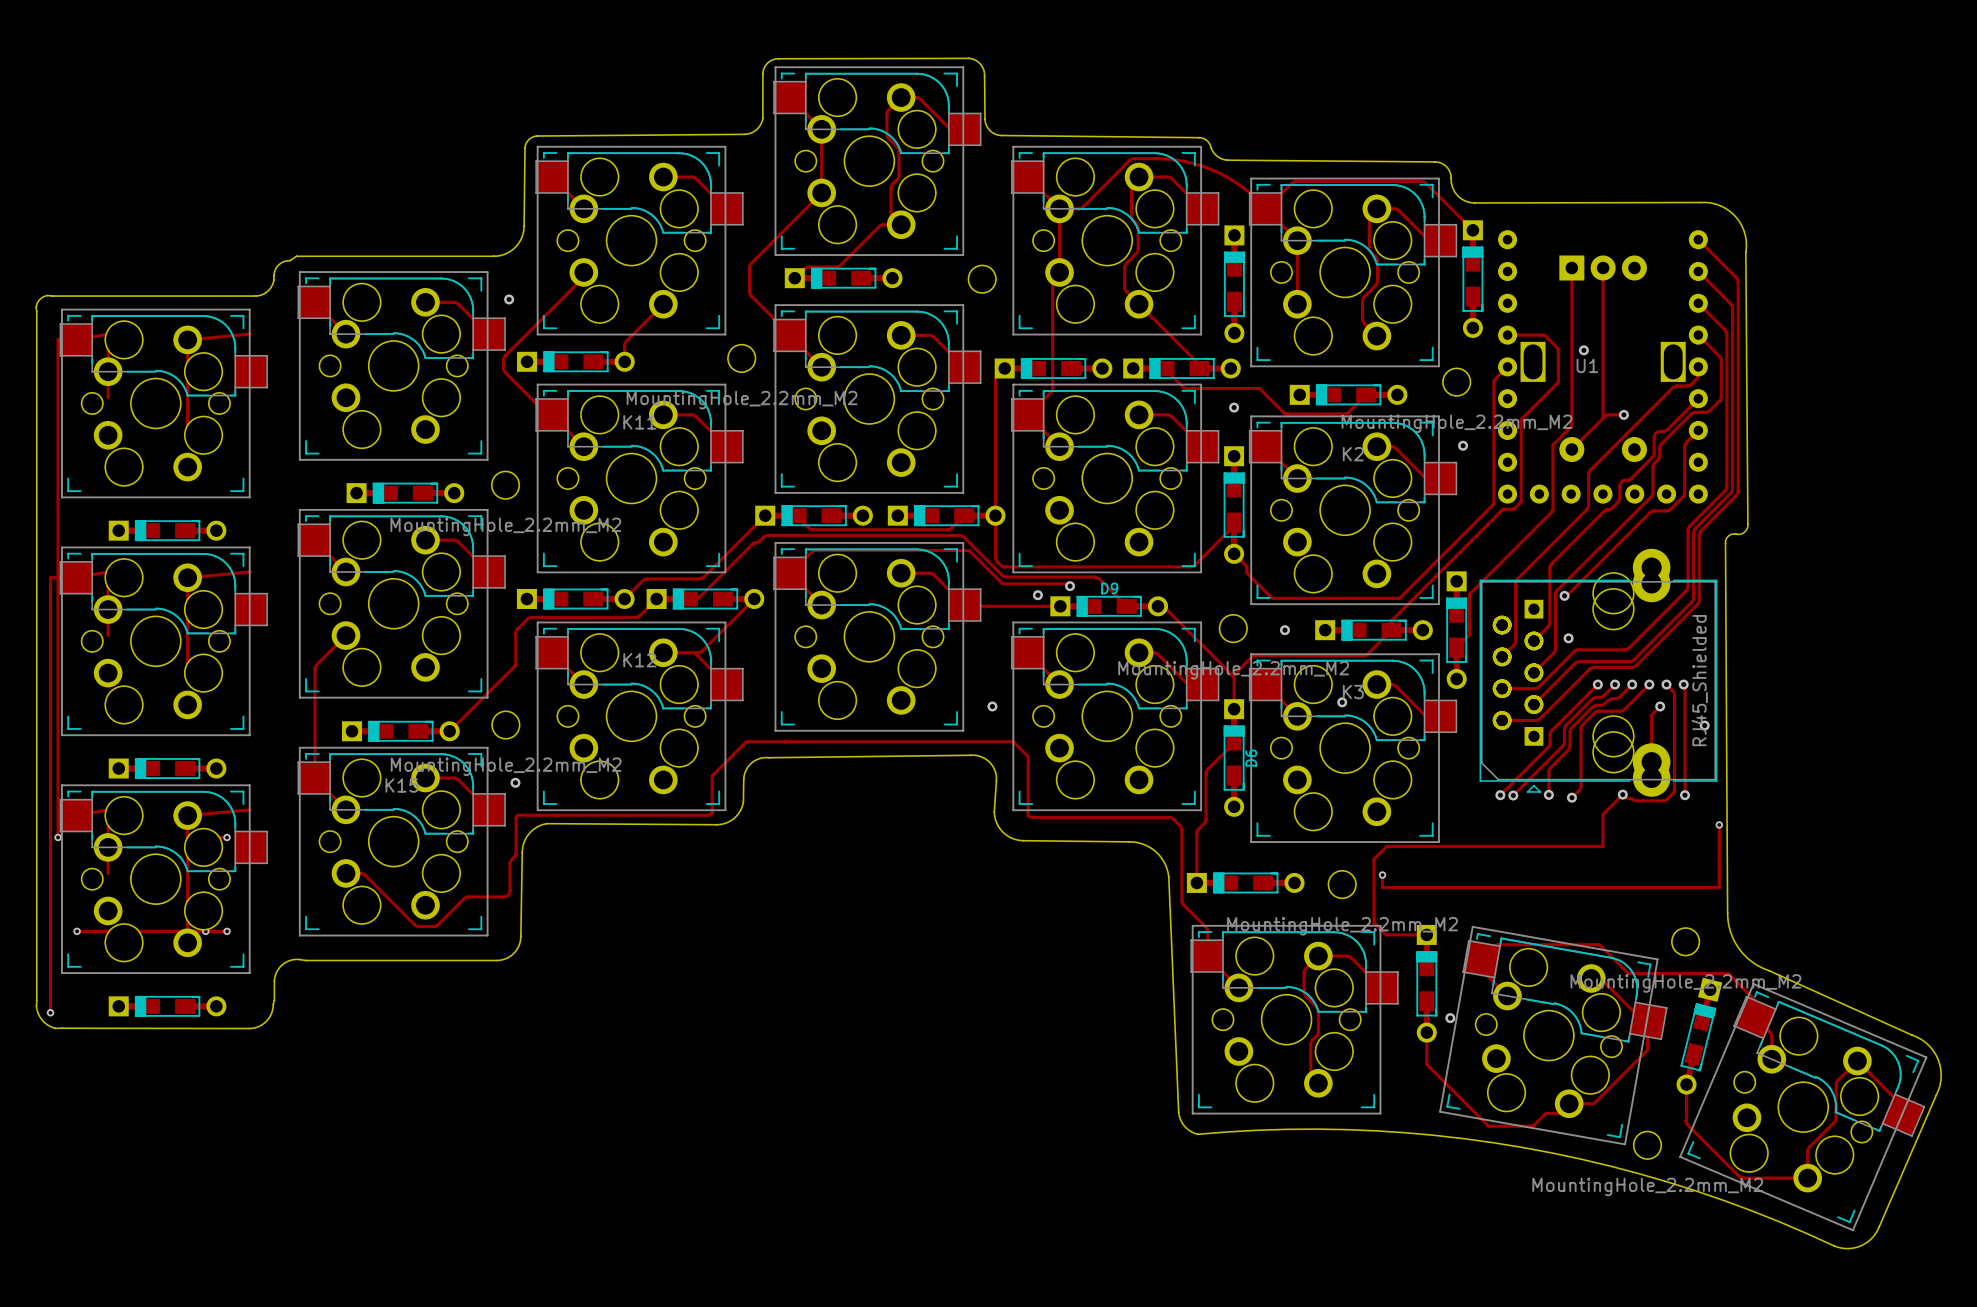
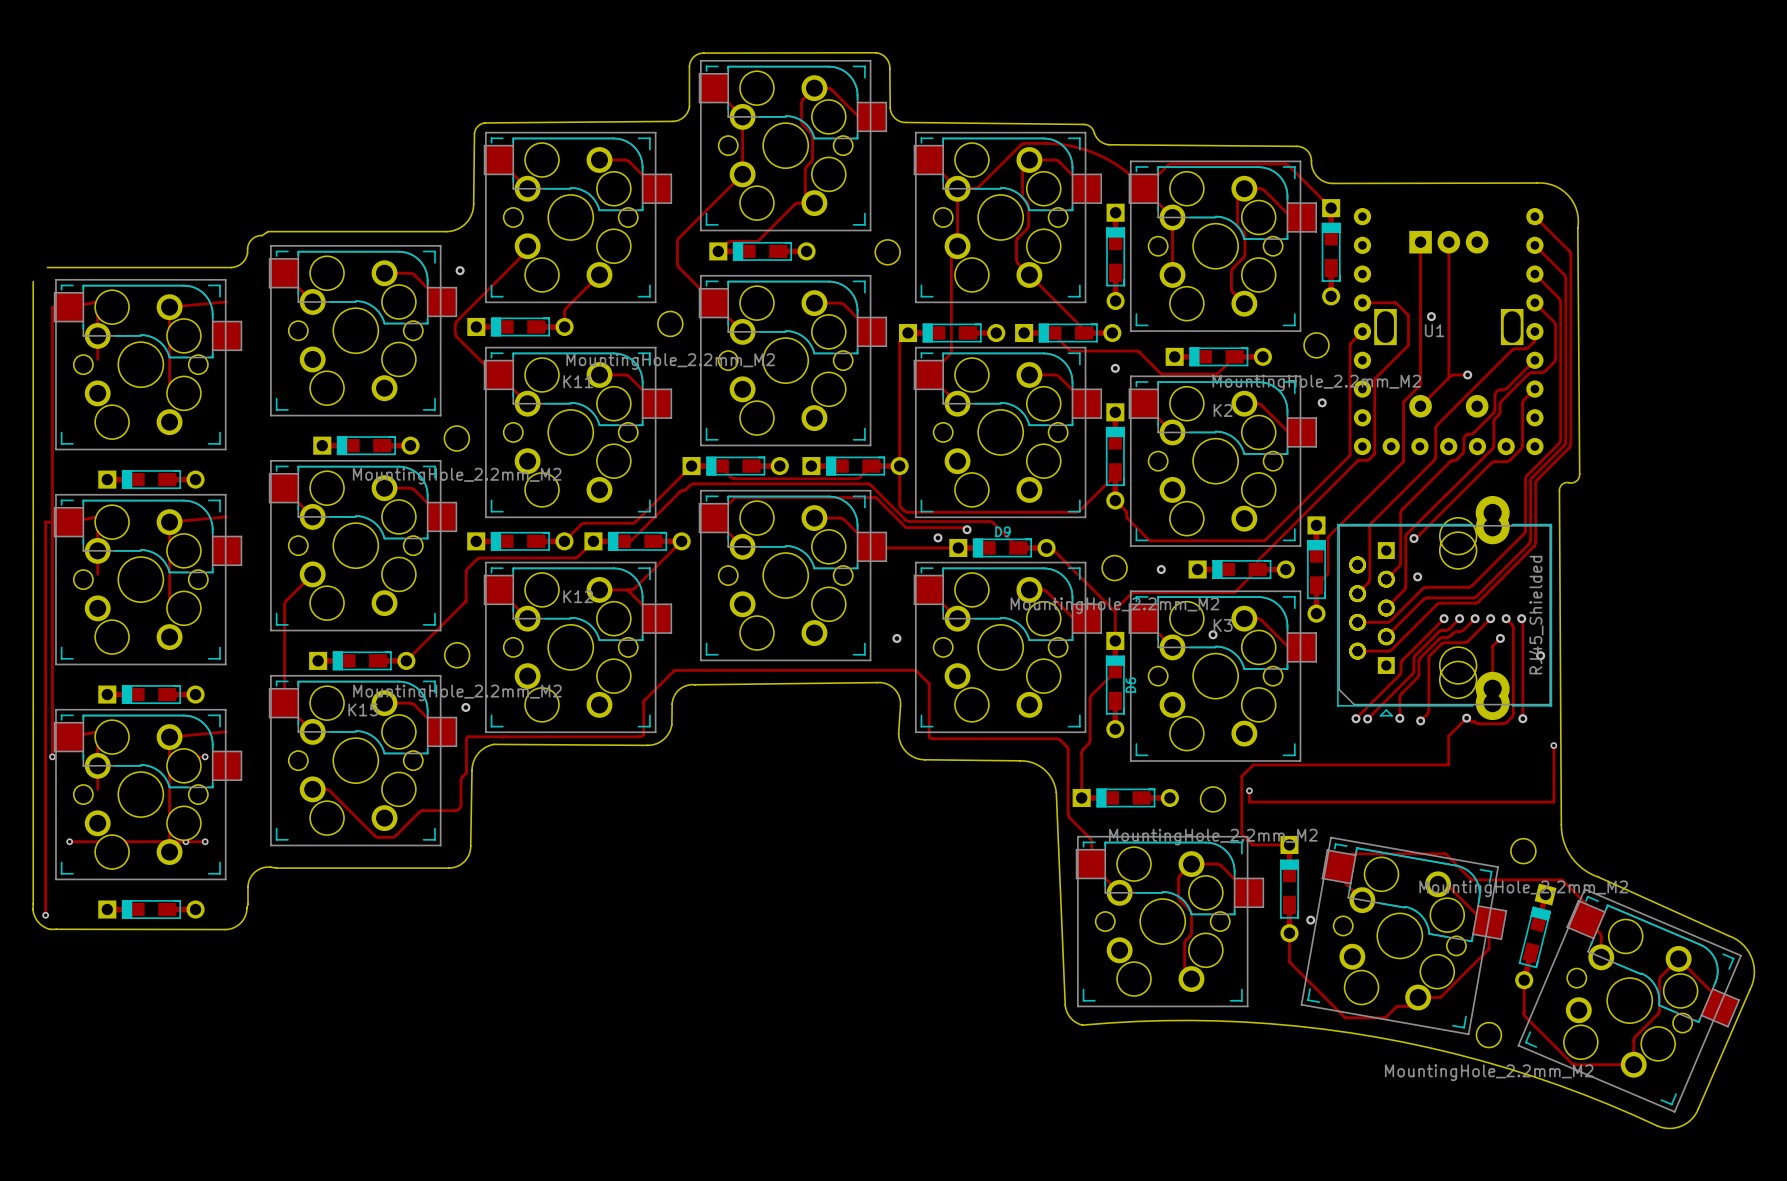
board edge: (52, 296) (46, 295) (39, 299) (36, 305) (36, 311) -> none

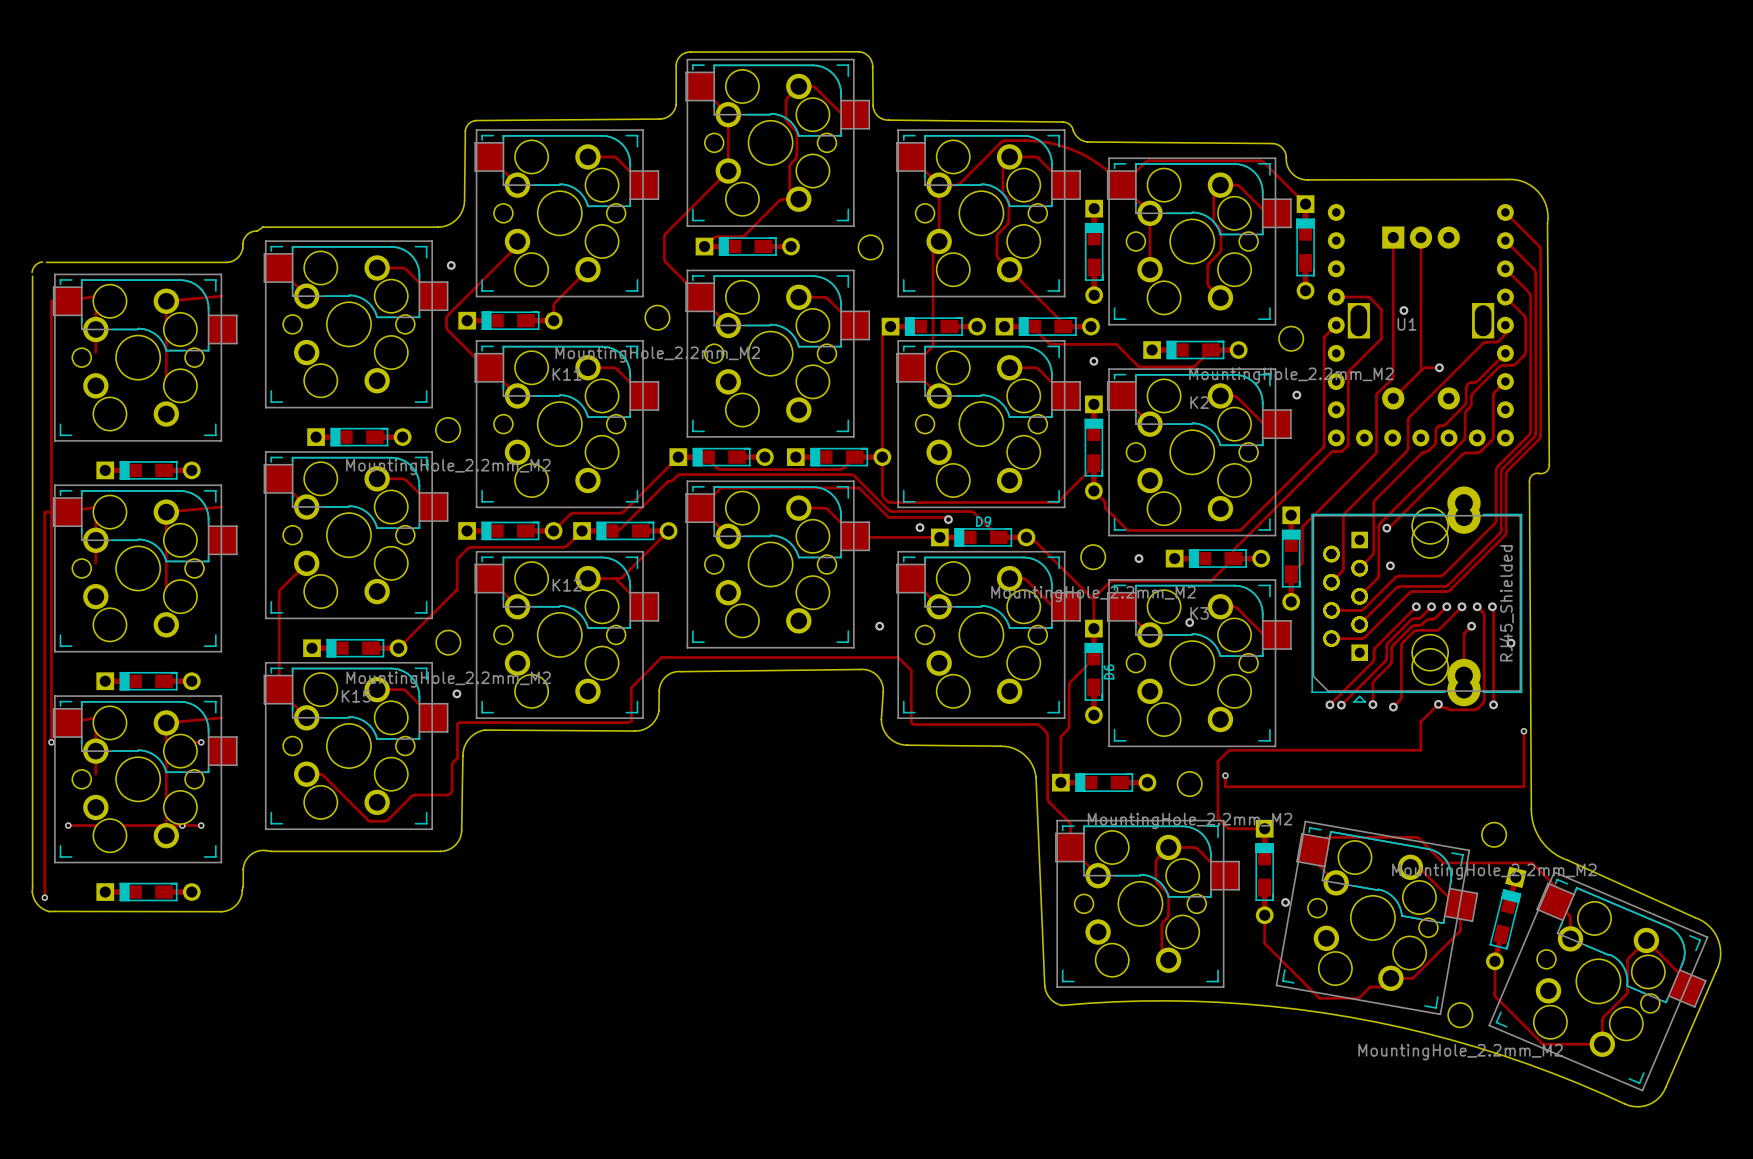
board edge: none -> (42, 261) (35, 265) (32, 272)

